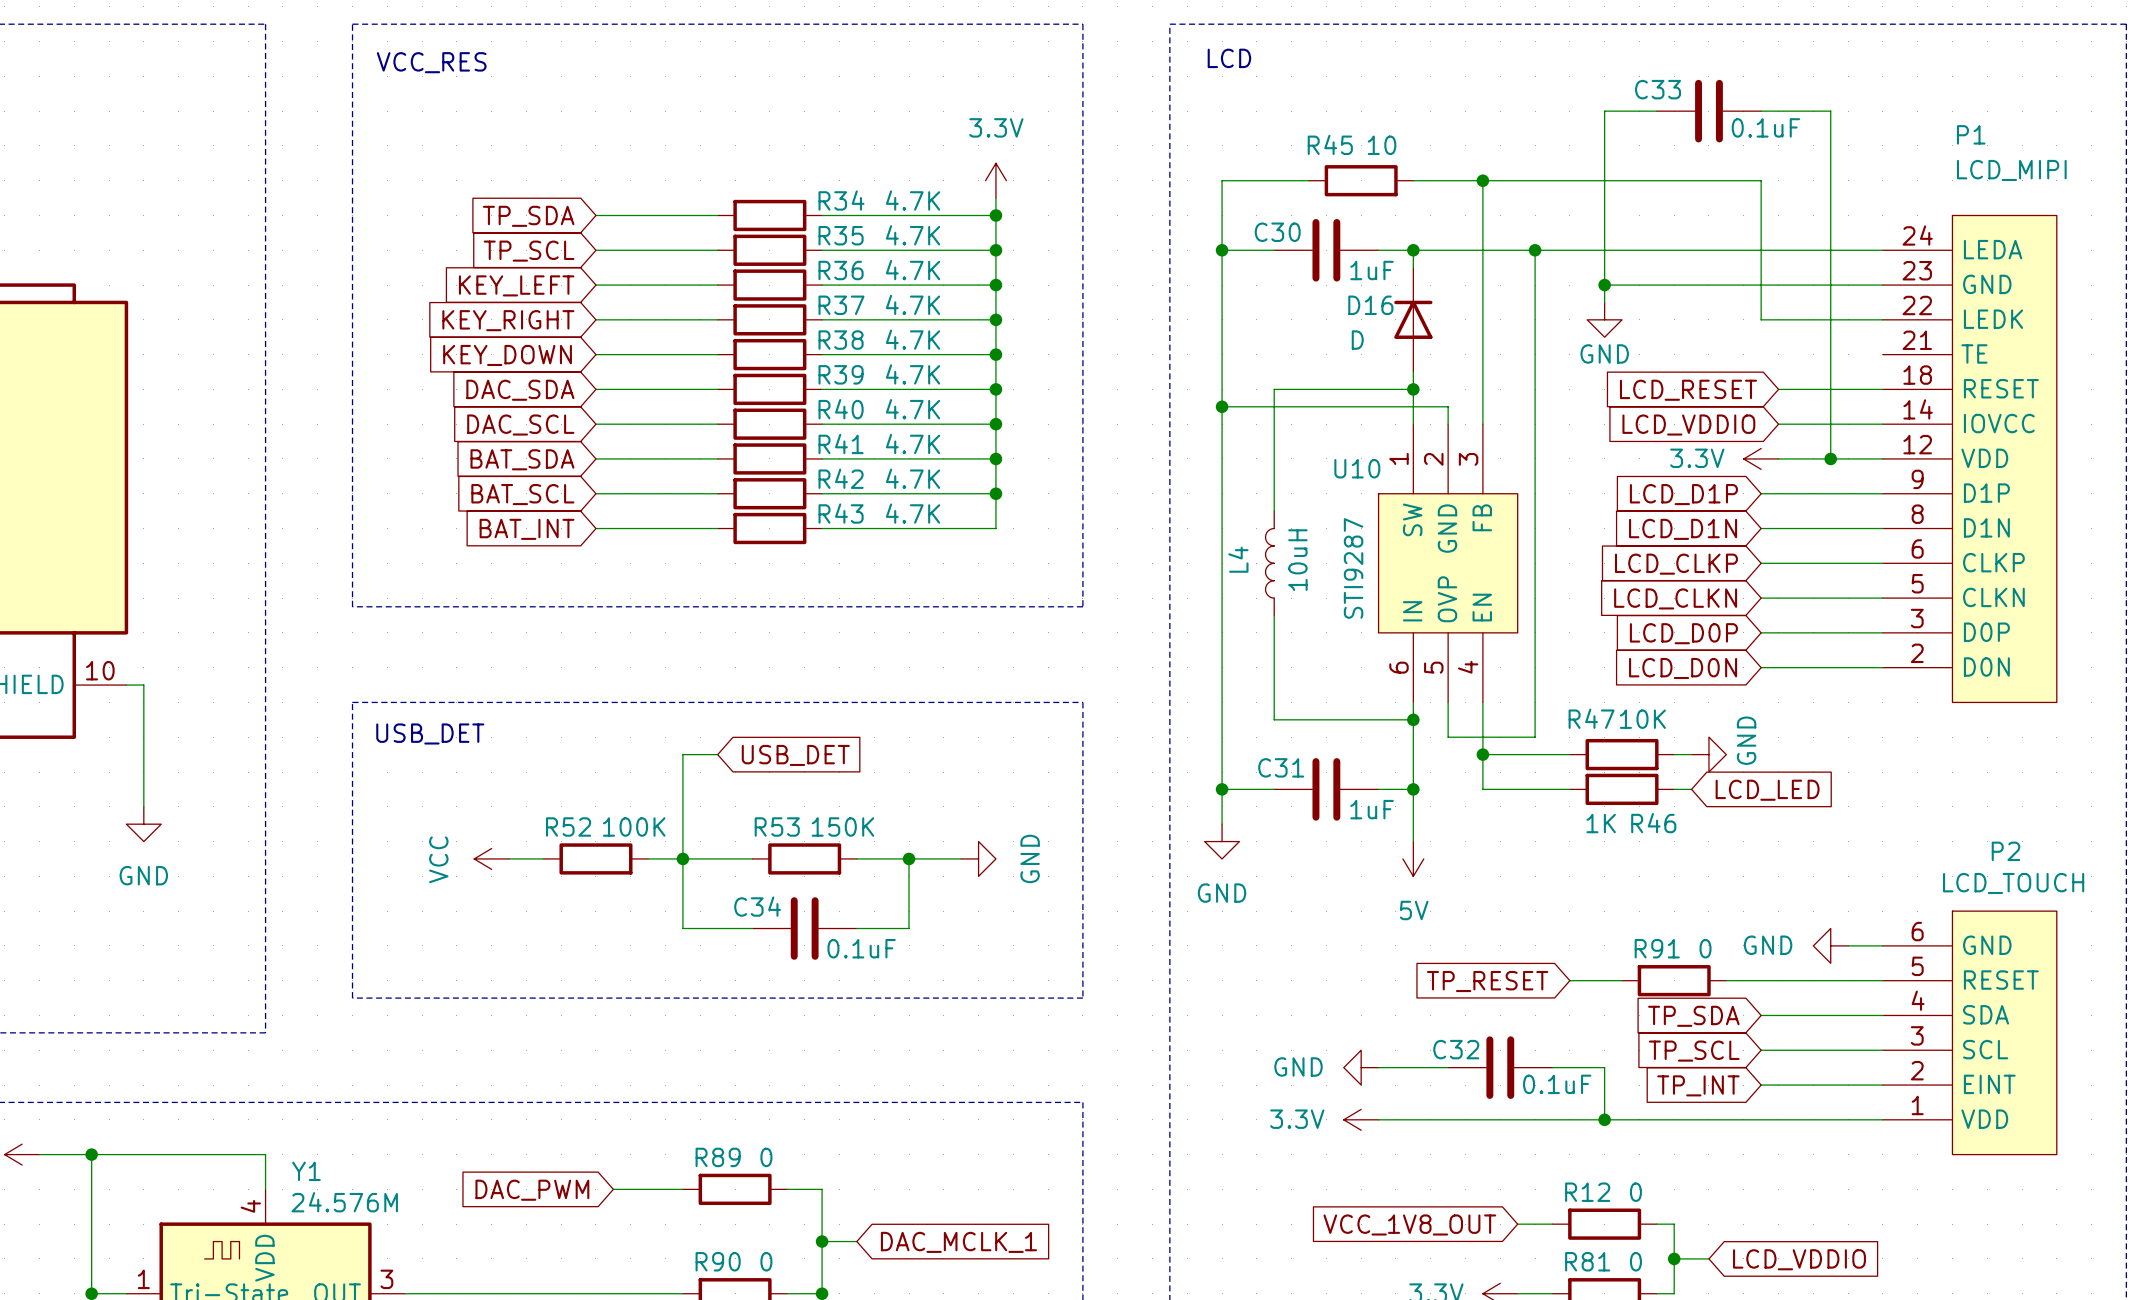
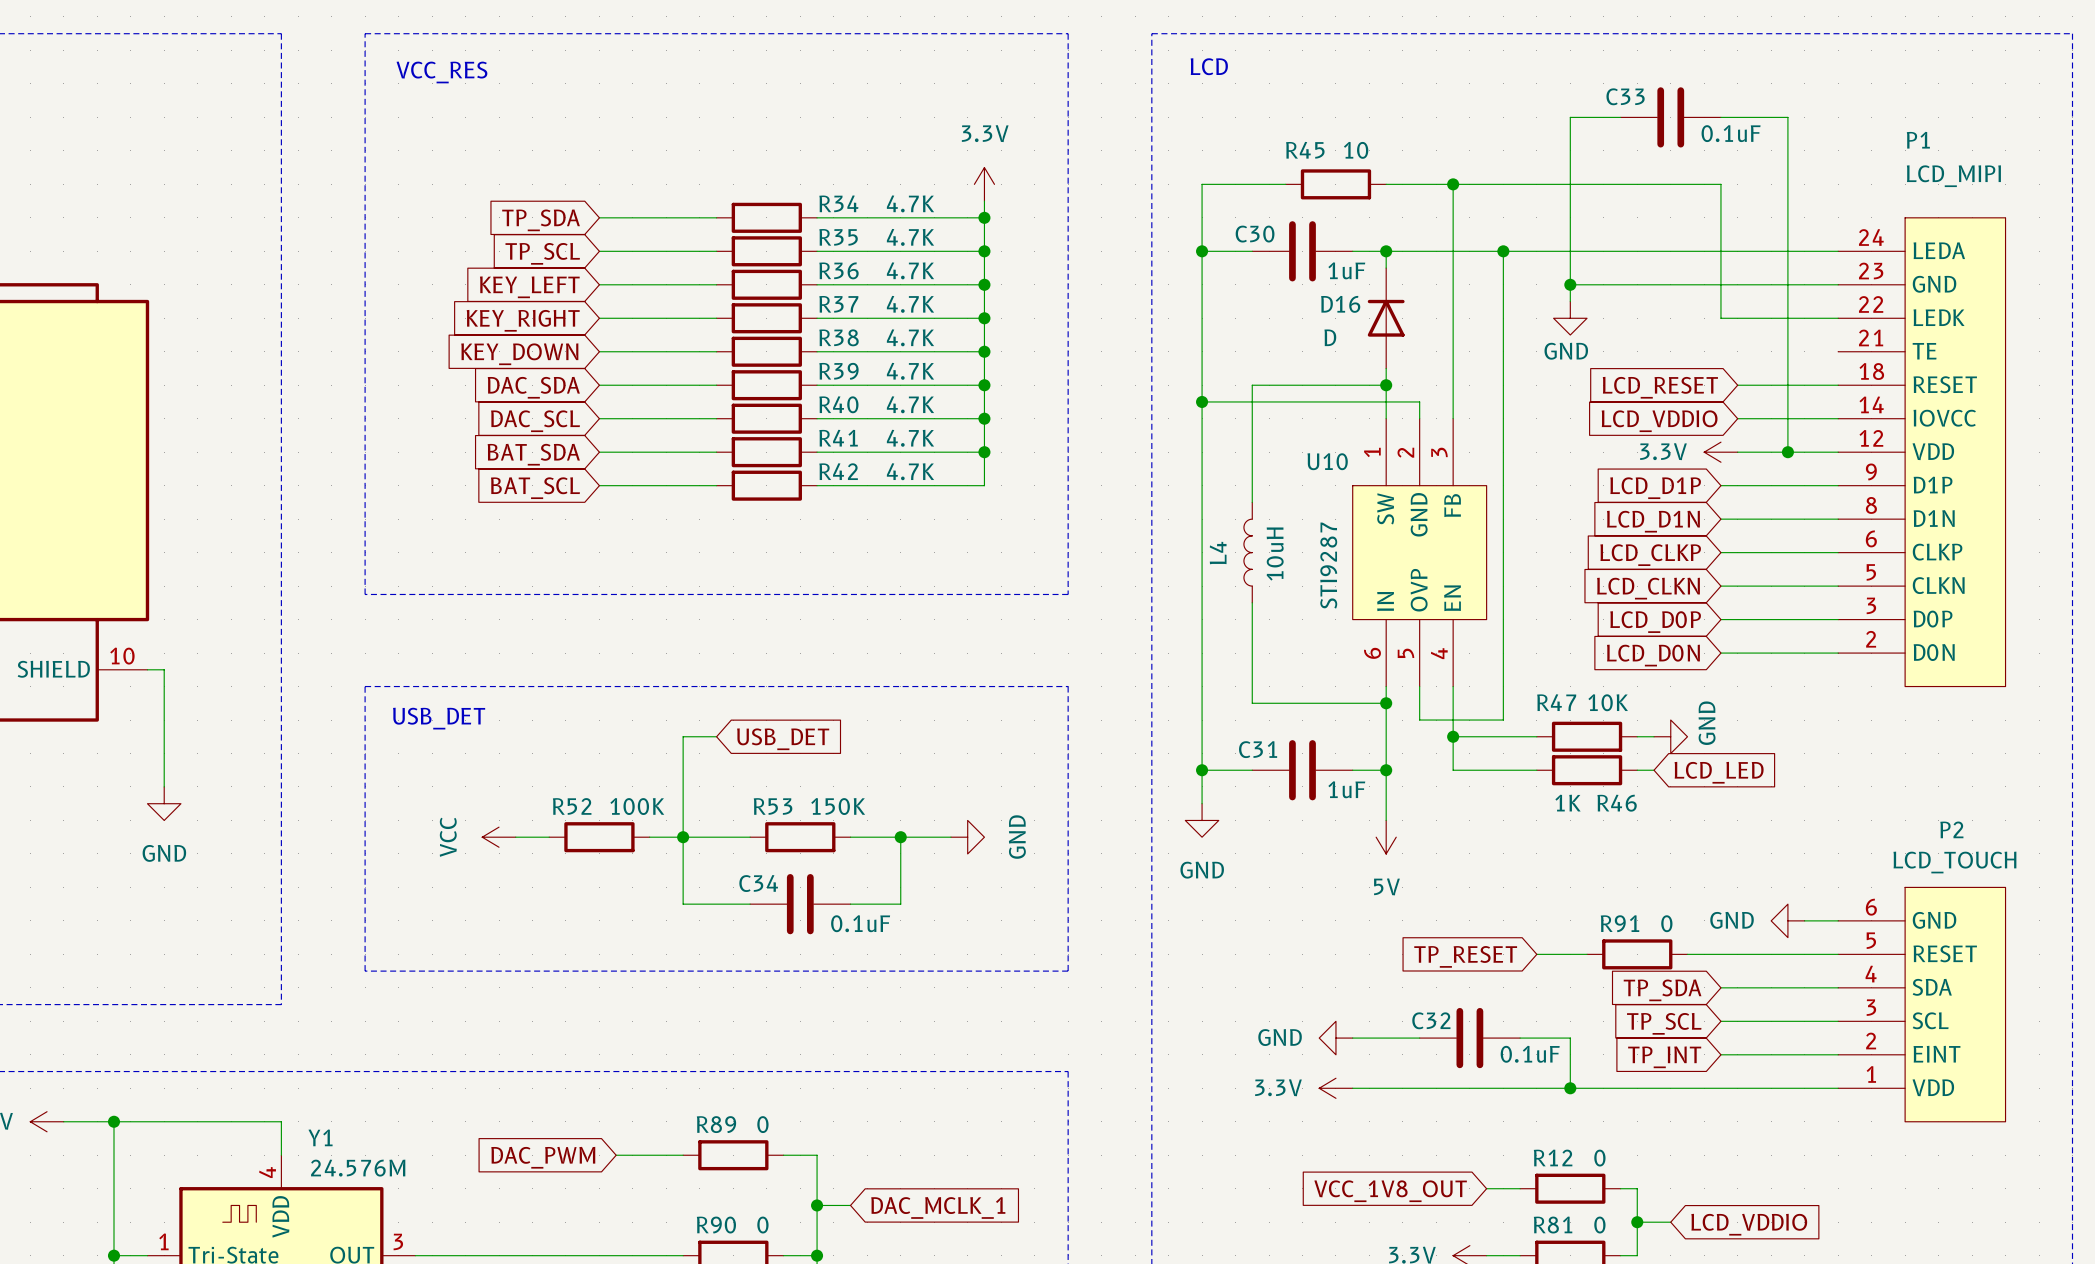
wire: (995, 493) (995, 528) (822, 528) -> none
junction: (995, 493) -> none
wire: (595, 528) (717, 528) -> none
R43: 4.7K (769, 528) -> none
global label: BAT_INT (527, 529) -> none

